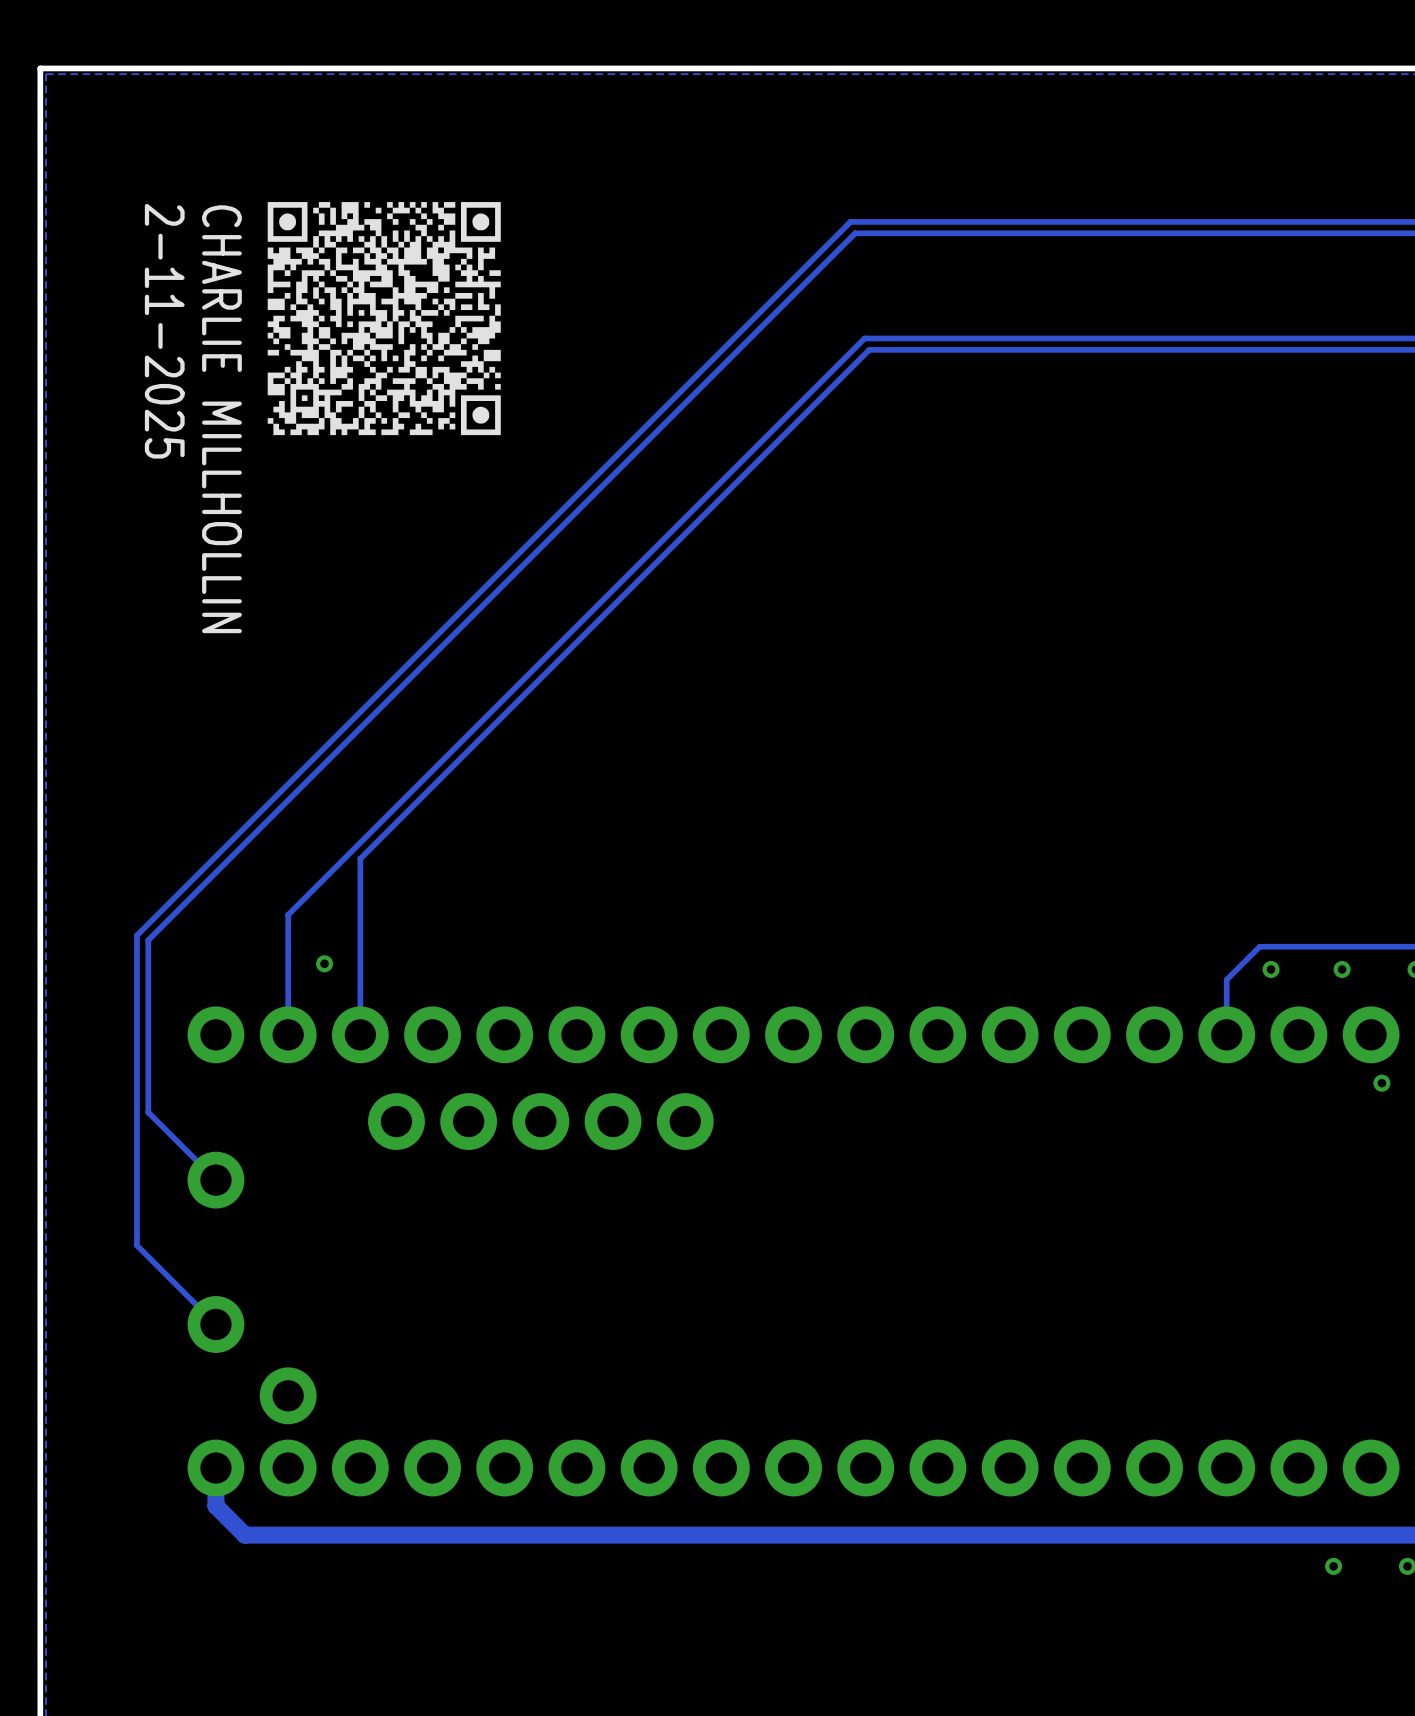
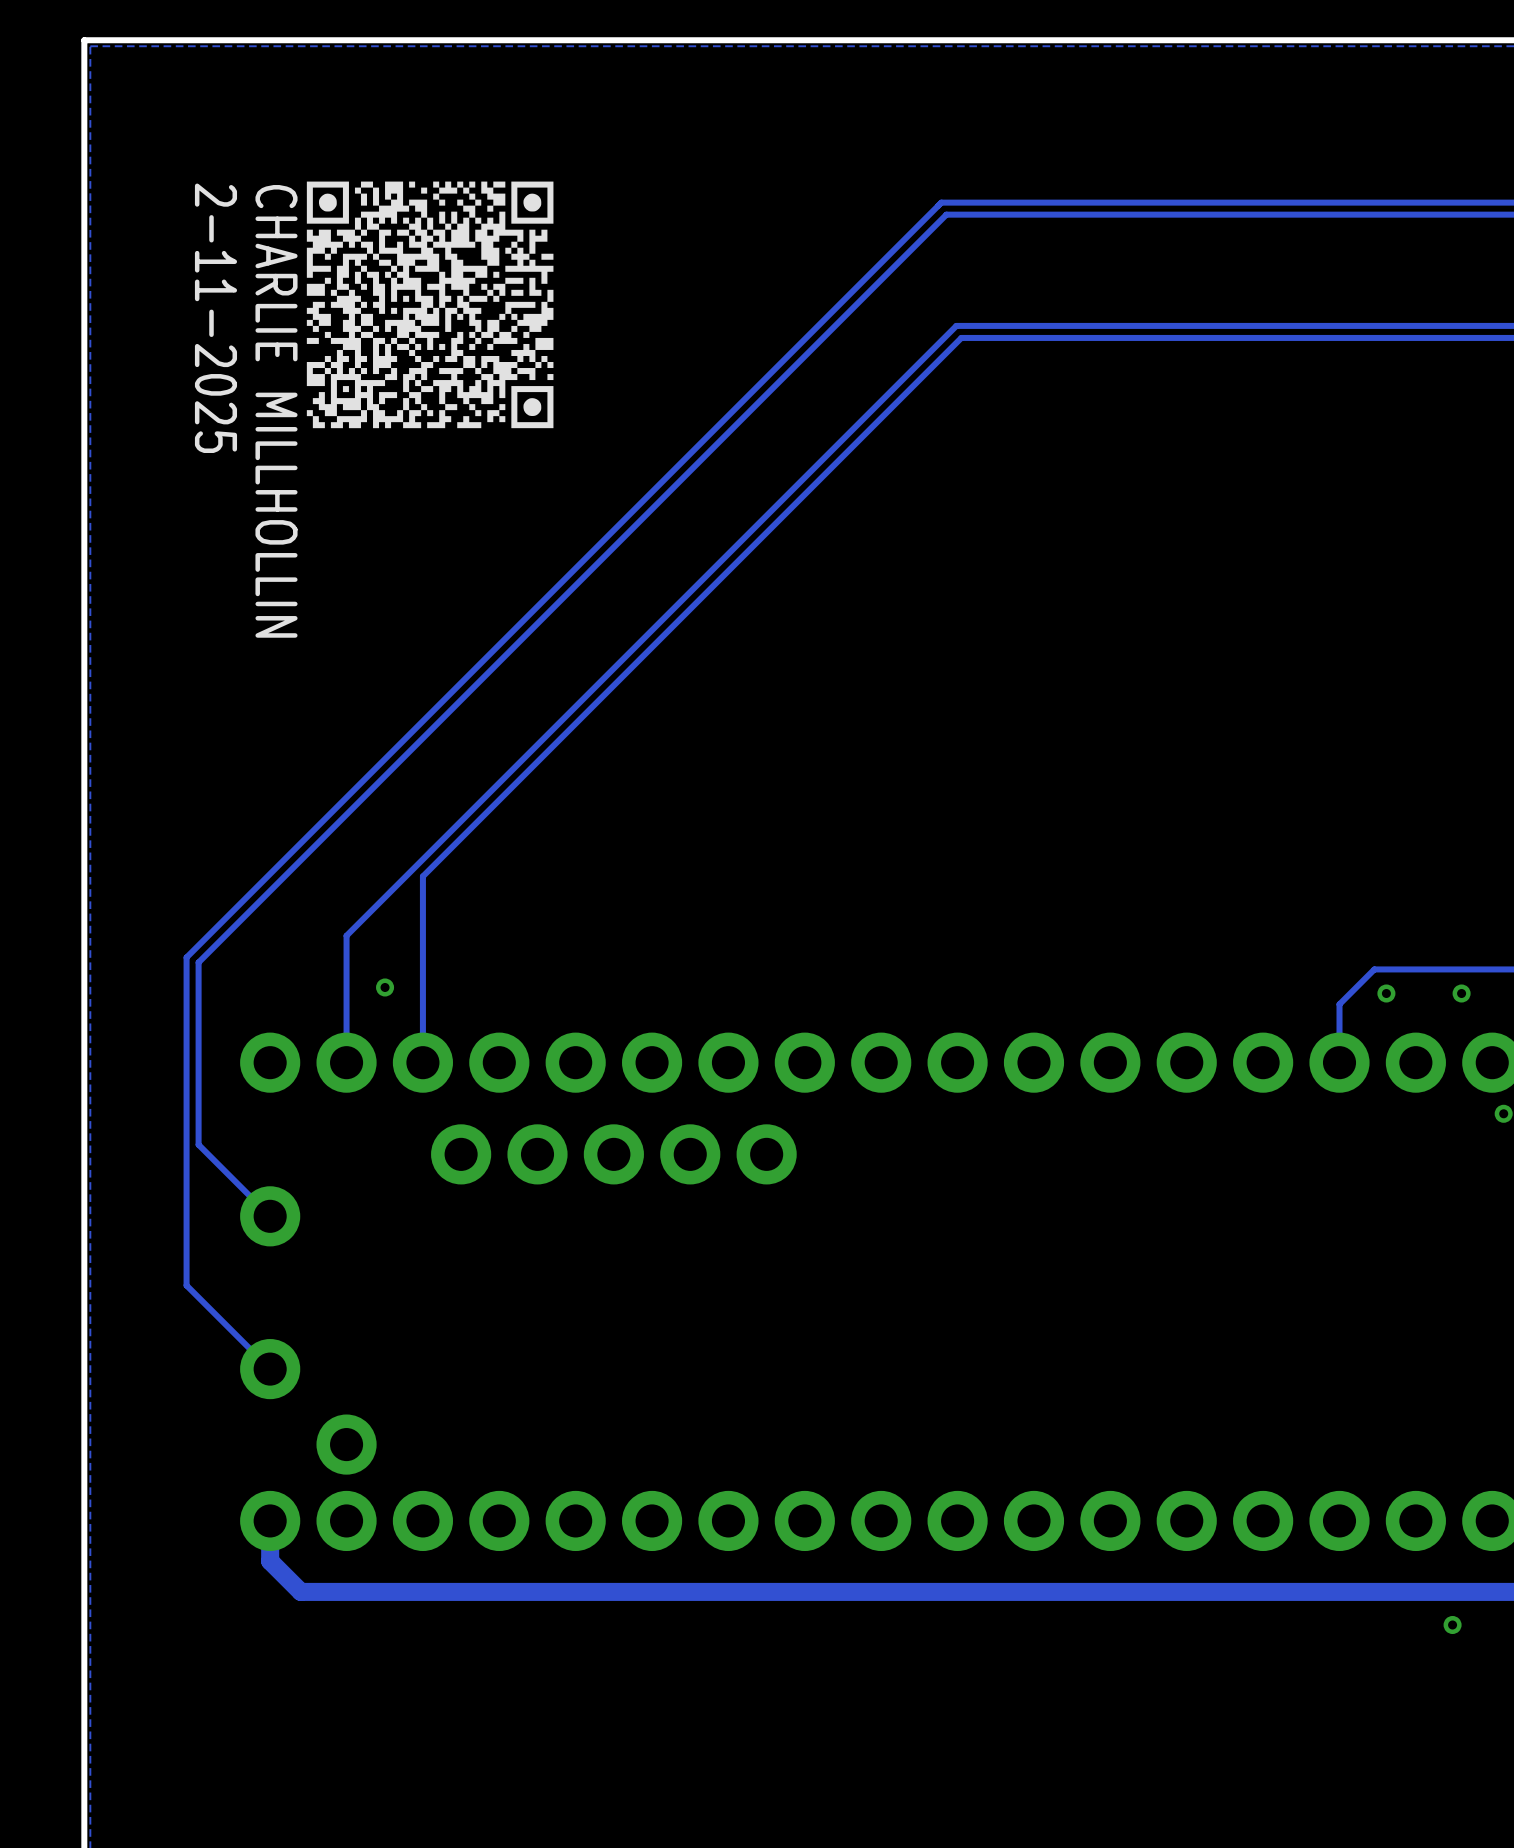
drawing position: (384, 318) -> (430, 304)

